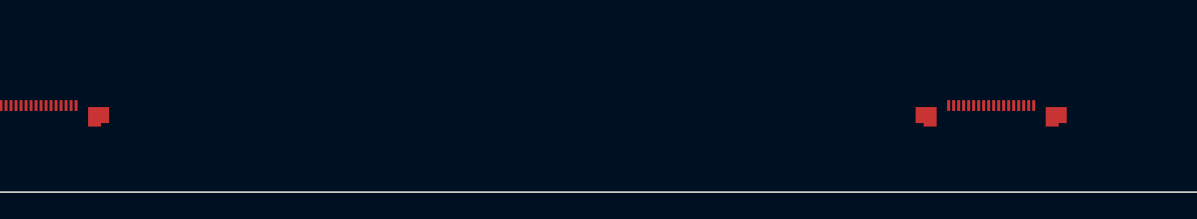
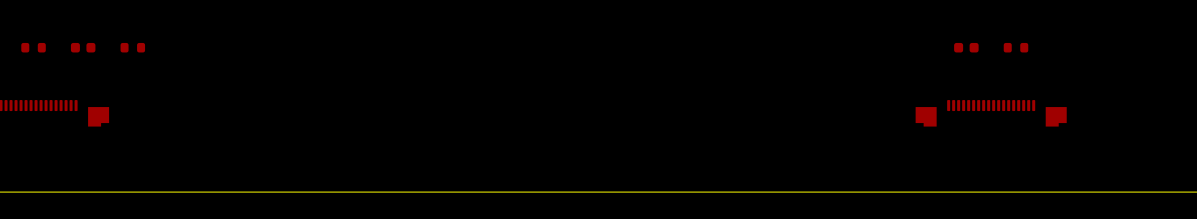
part: none -> (33, 47)
part: none -> (83, 47)
part: none -> (132, 47)
part: none -> (966, 47)
part: none -> (1015, 47)

